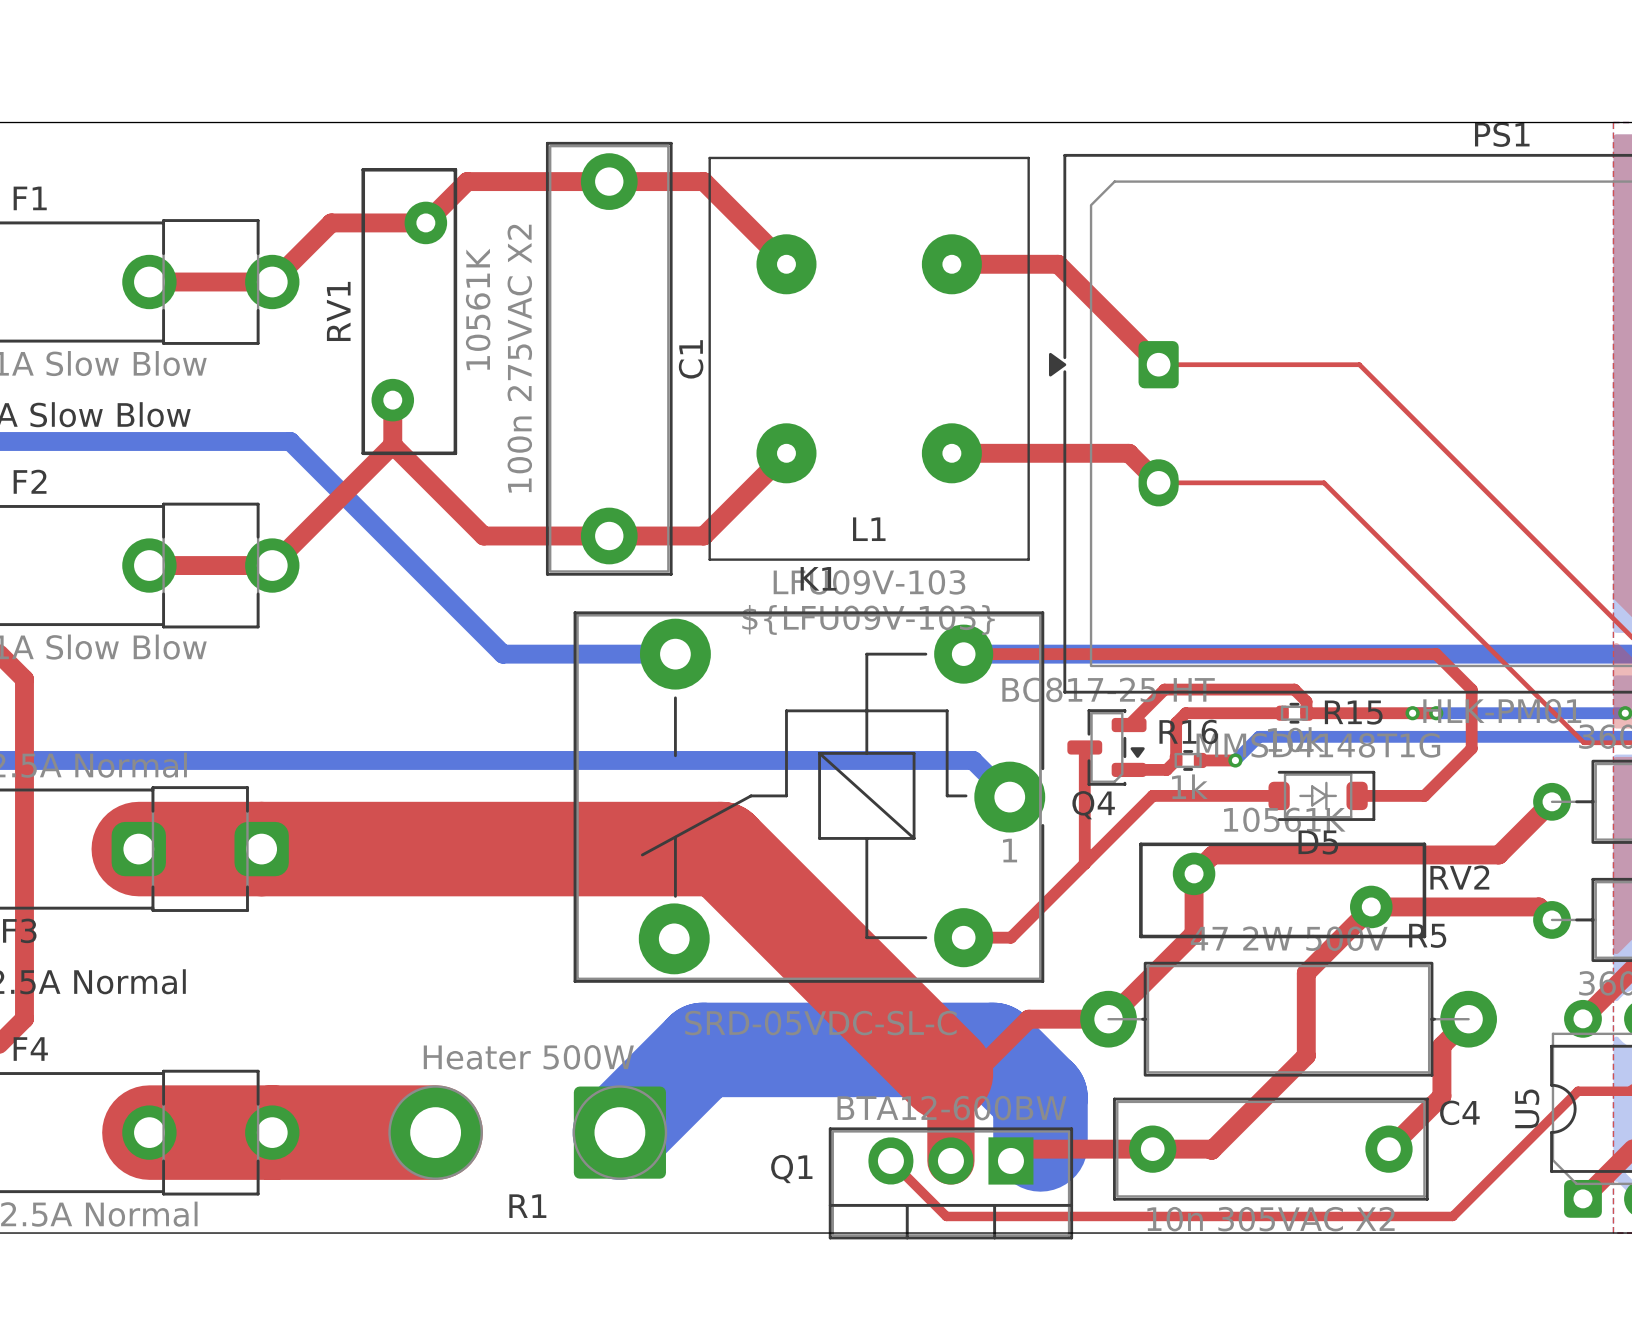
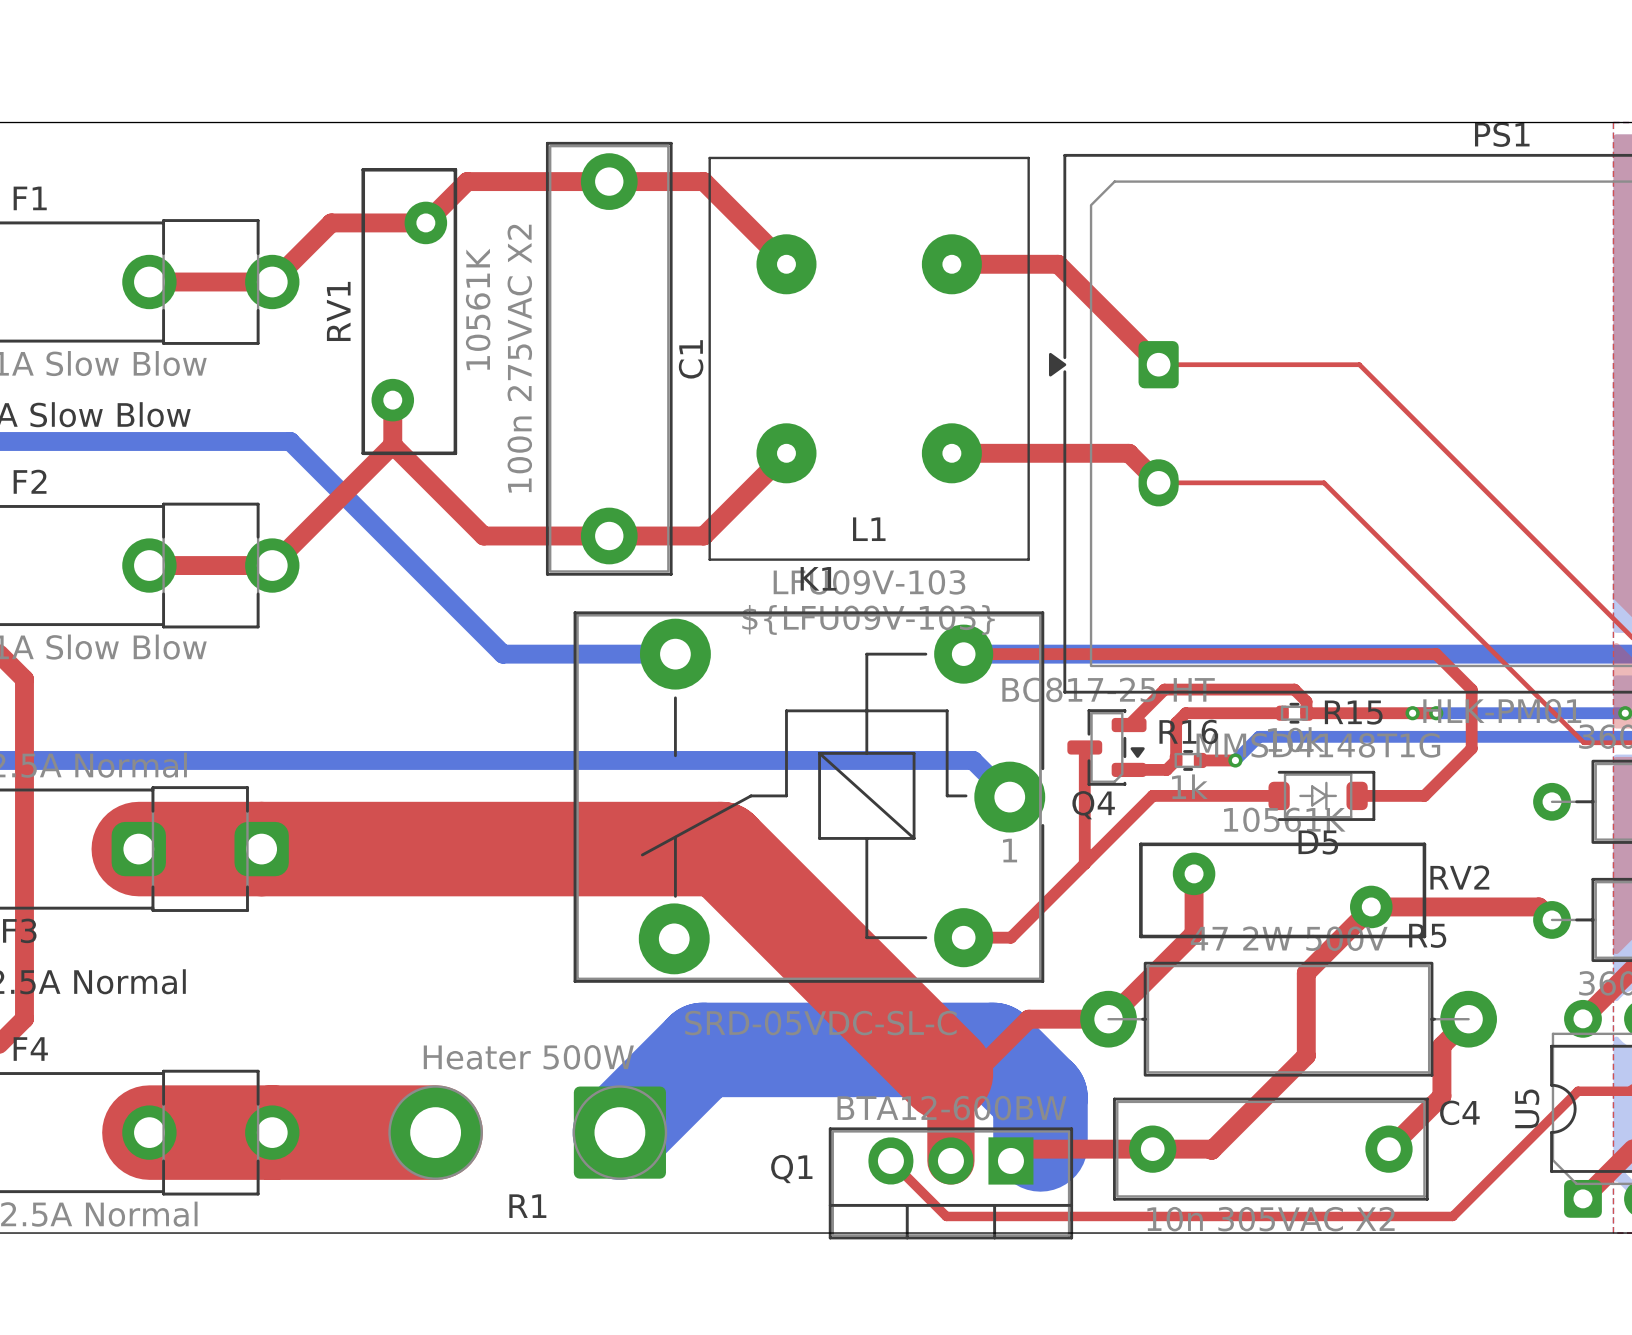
top track: (1552, 801) (1498, 854) (1212, 854) (1194, 873) -> none

